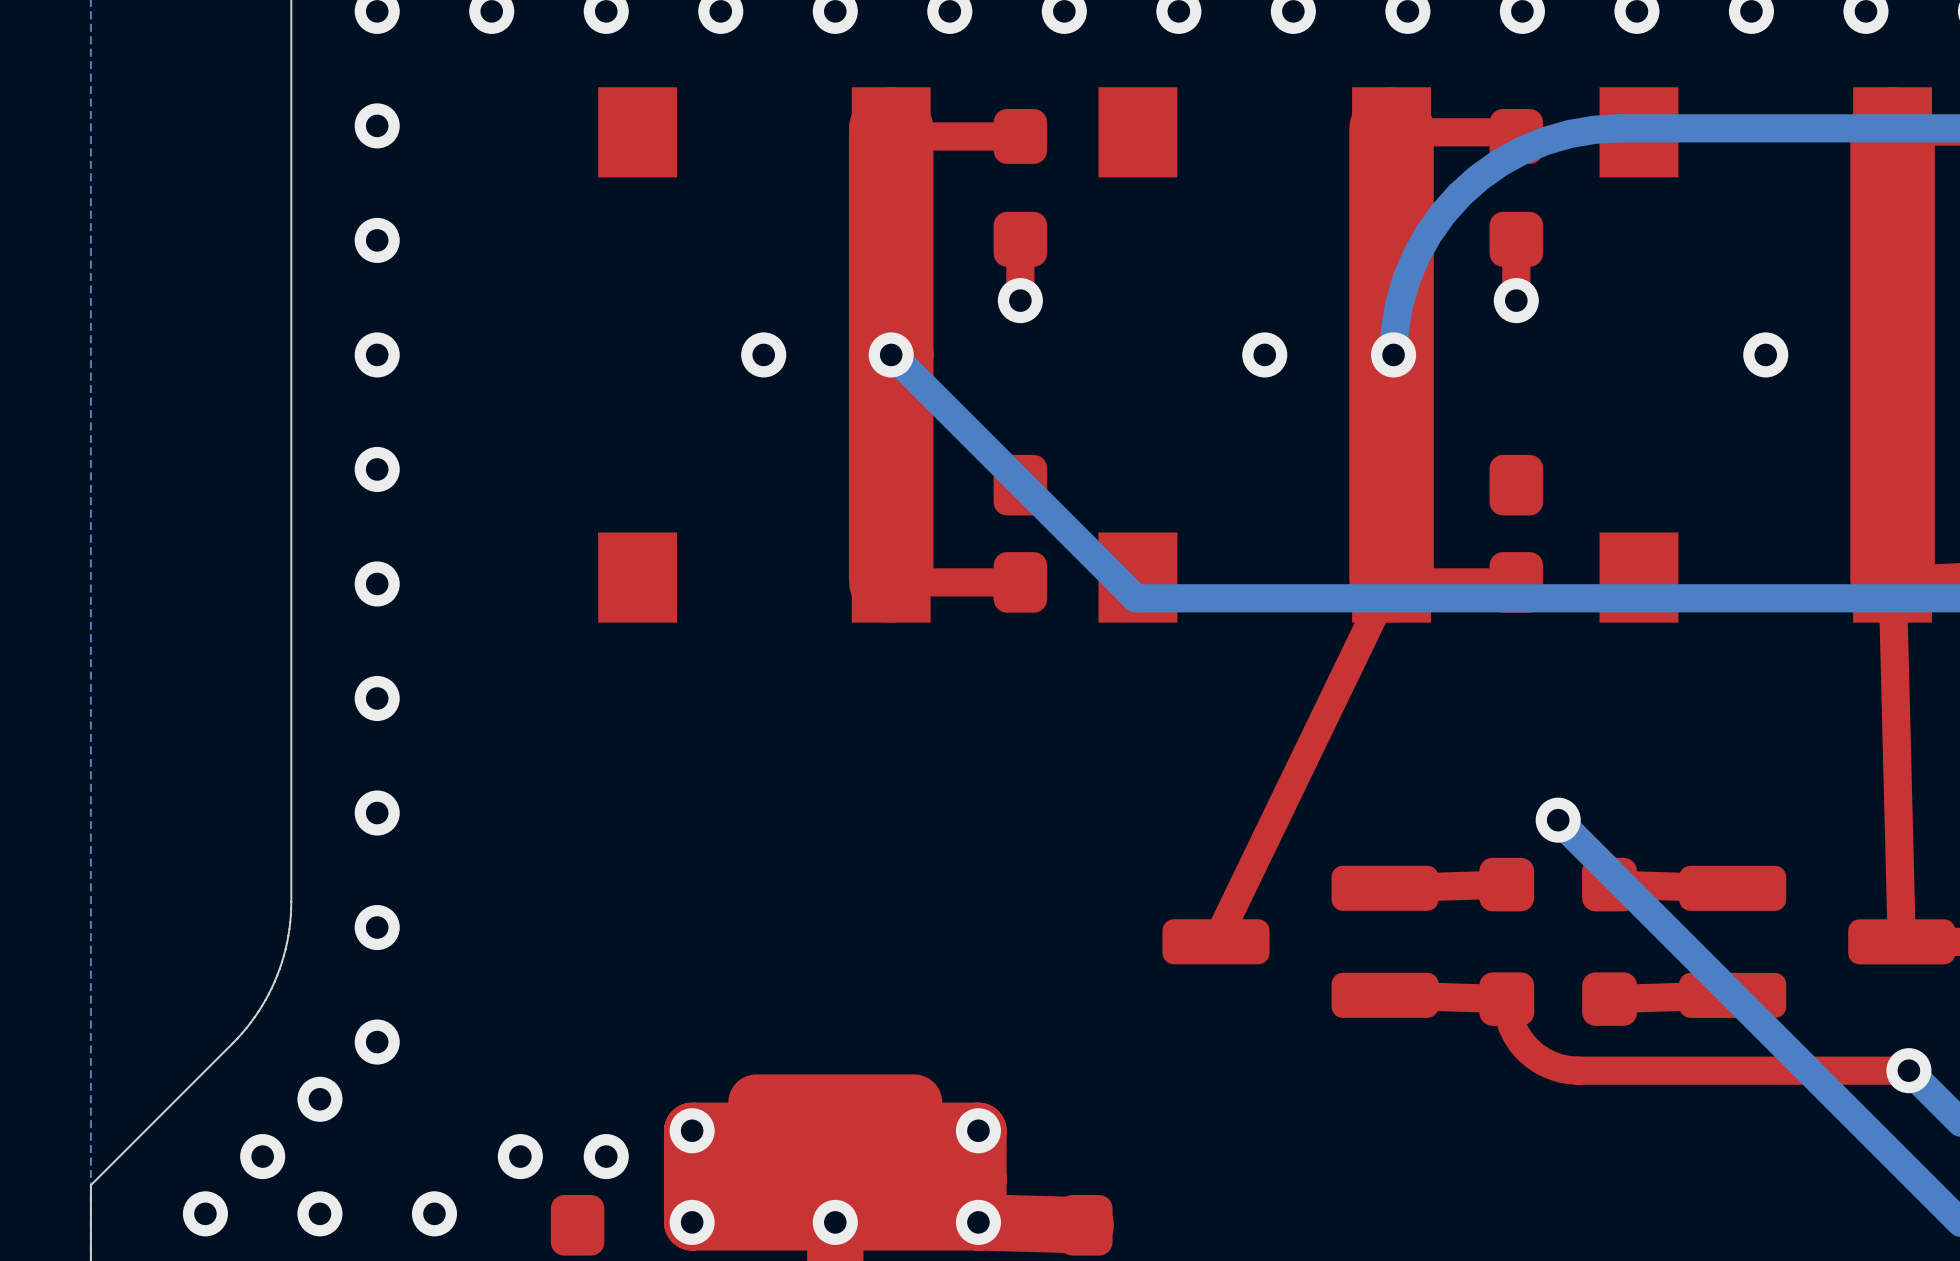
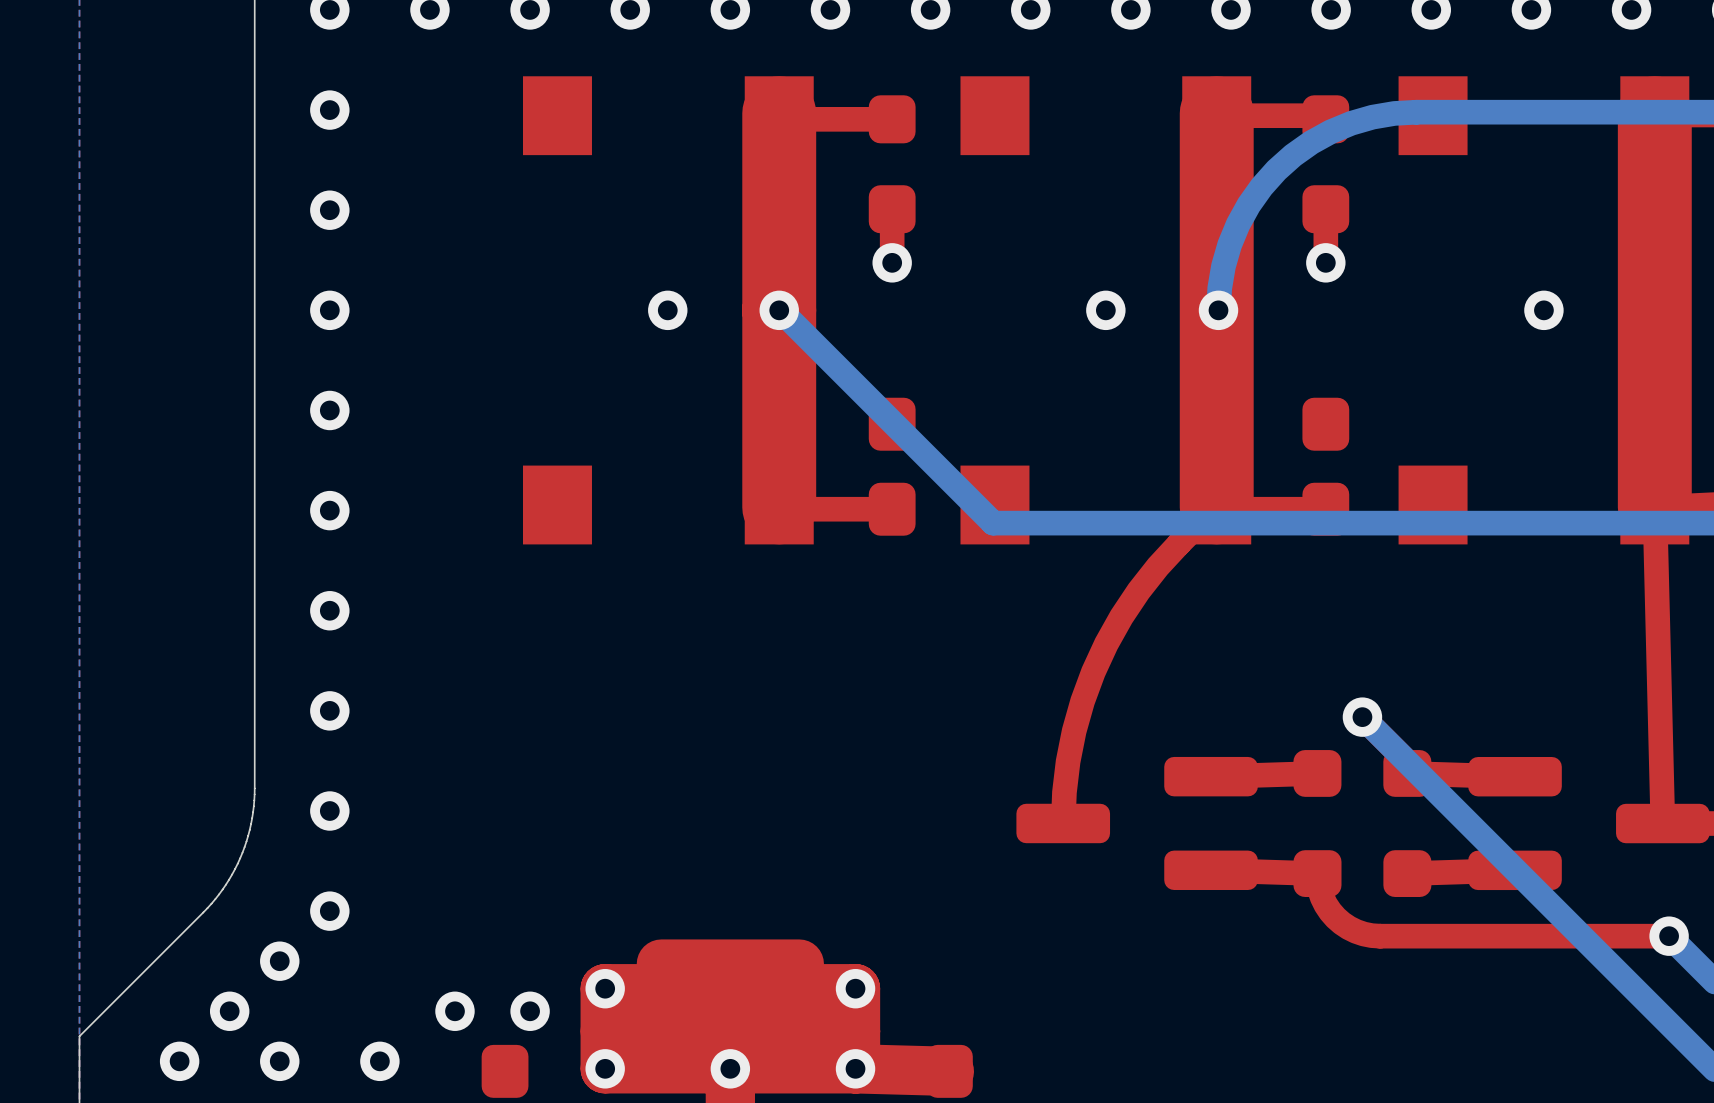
top track: (1391, 578) (1215, 941) -> (1216, 506) (1158, 566) (1121, 616) (1106, 643) (1093, 672) (1074, 731) (1064, 792) (1063, 823)

